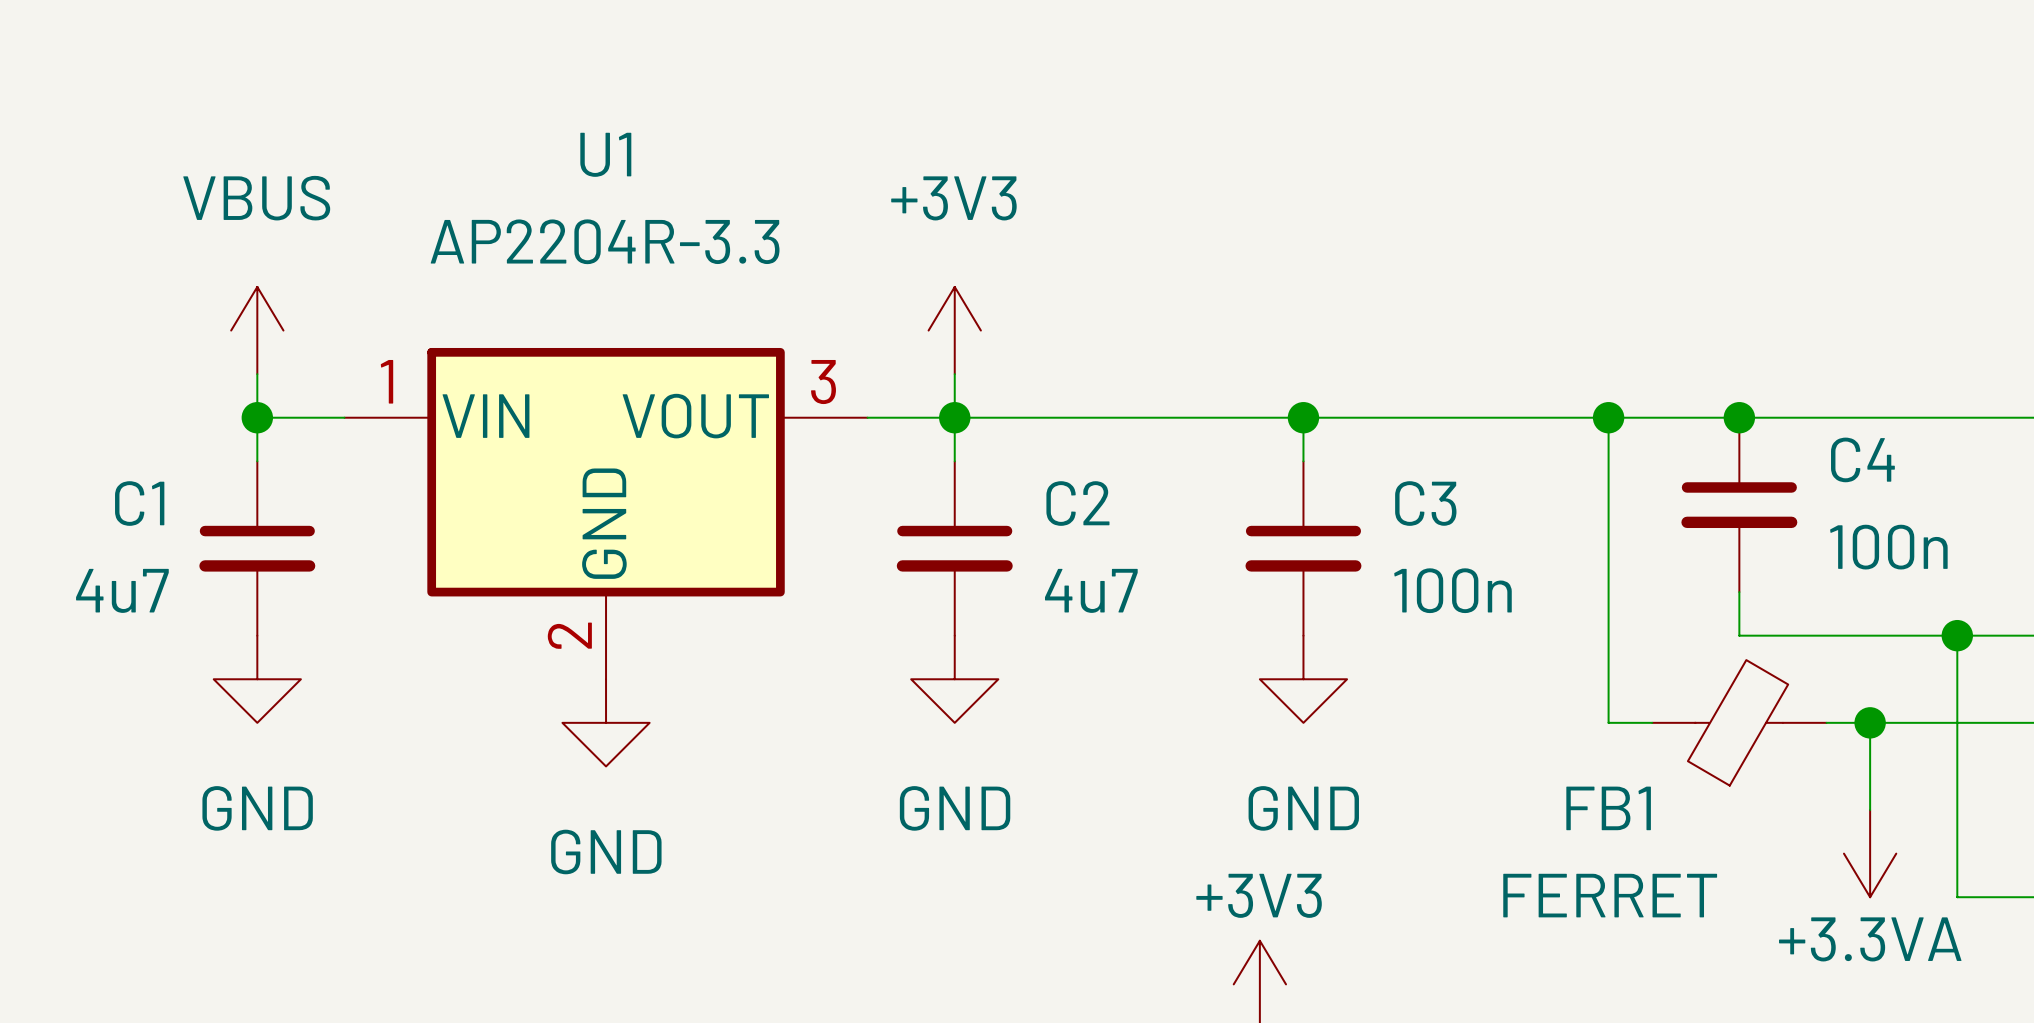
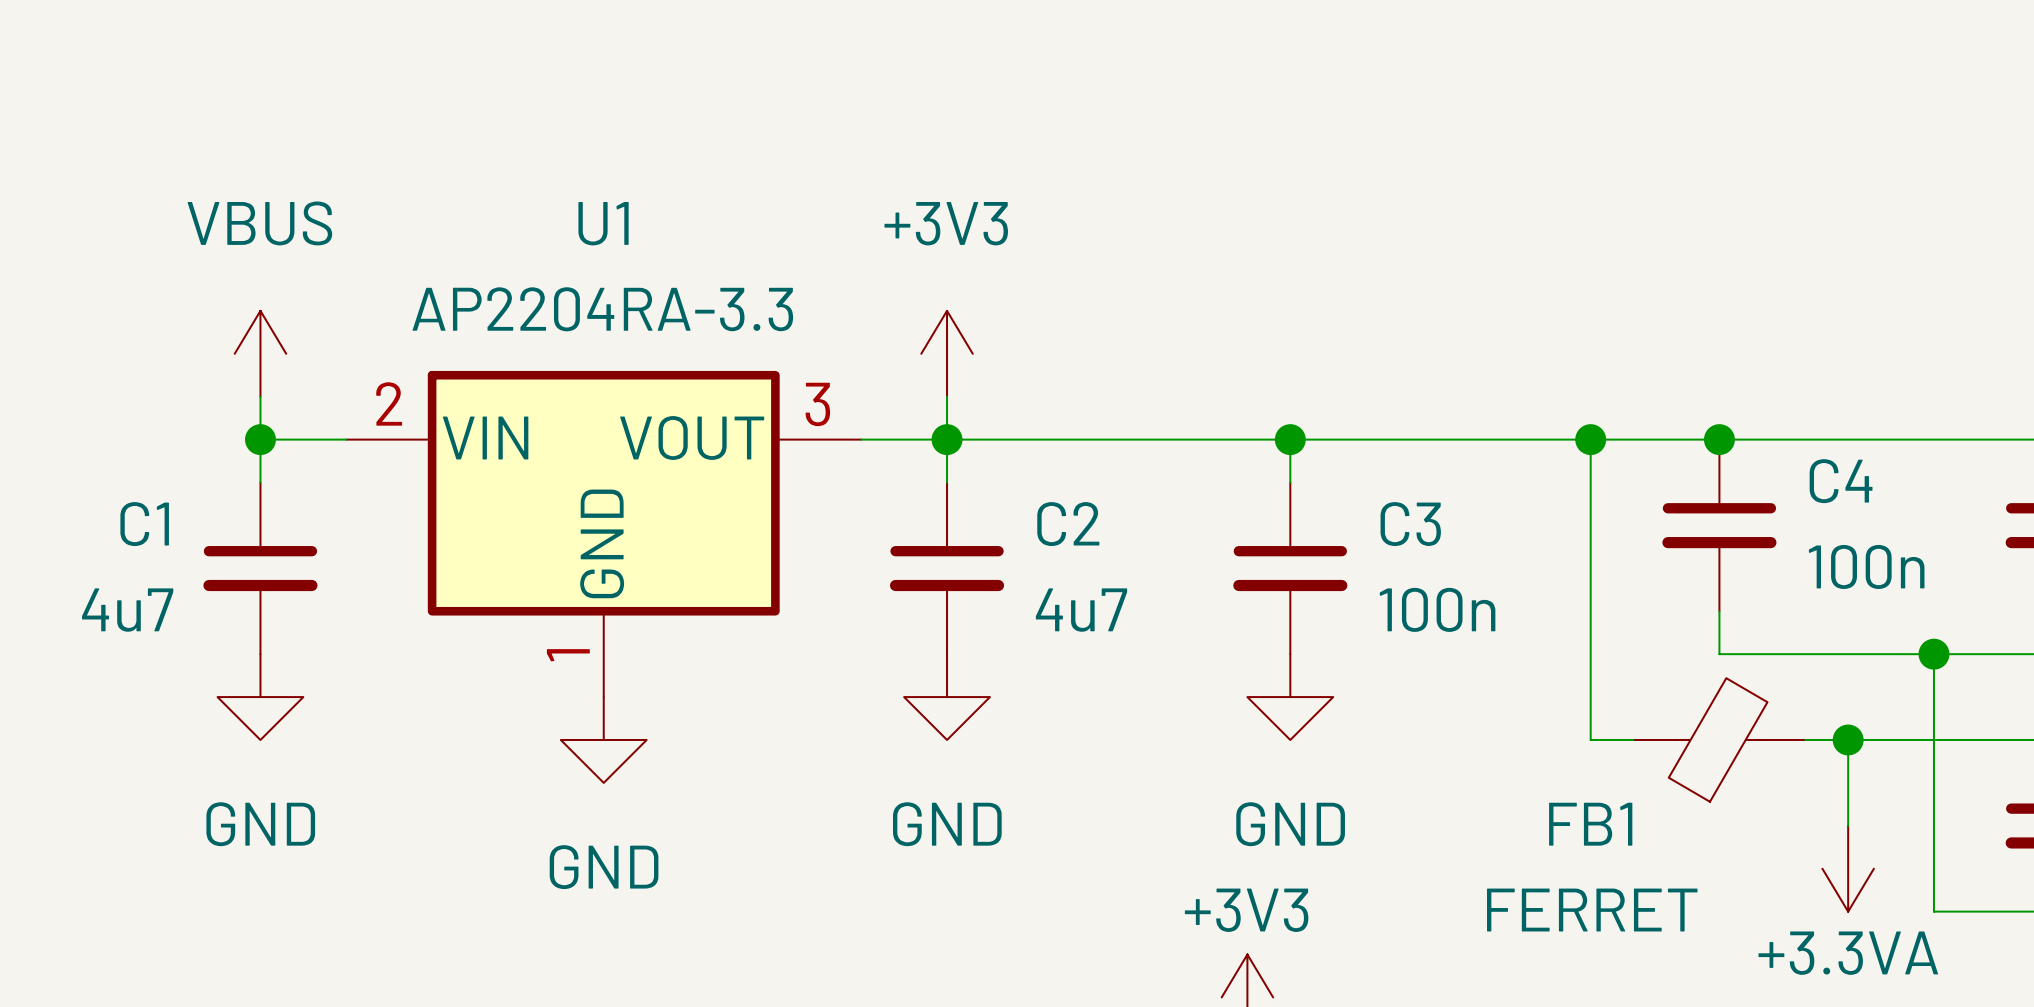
U1 name position: U1 (605, 154) -> U1 (603, 223)
U1 value: AP2204R-3.3 (605, 241) -> AP2204RA-3.3 (602, 309)
U1 pin number: 1 (387, 381) -> 2 (389, 403)
U1 pin number: 2 (569, 635) -> 1 (568, 655)

